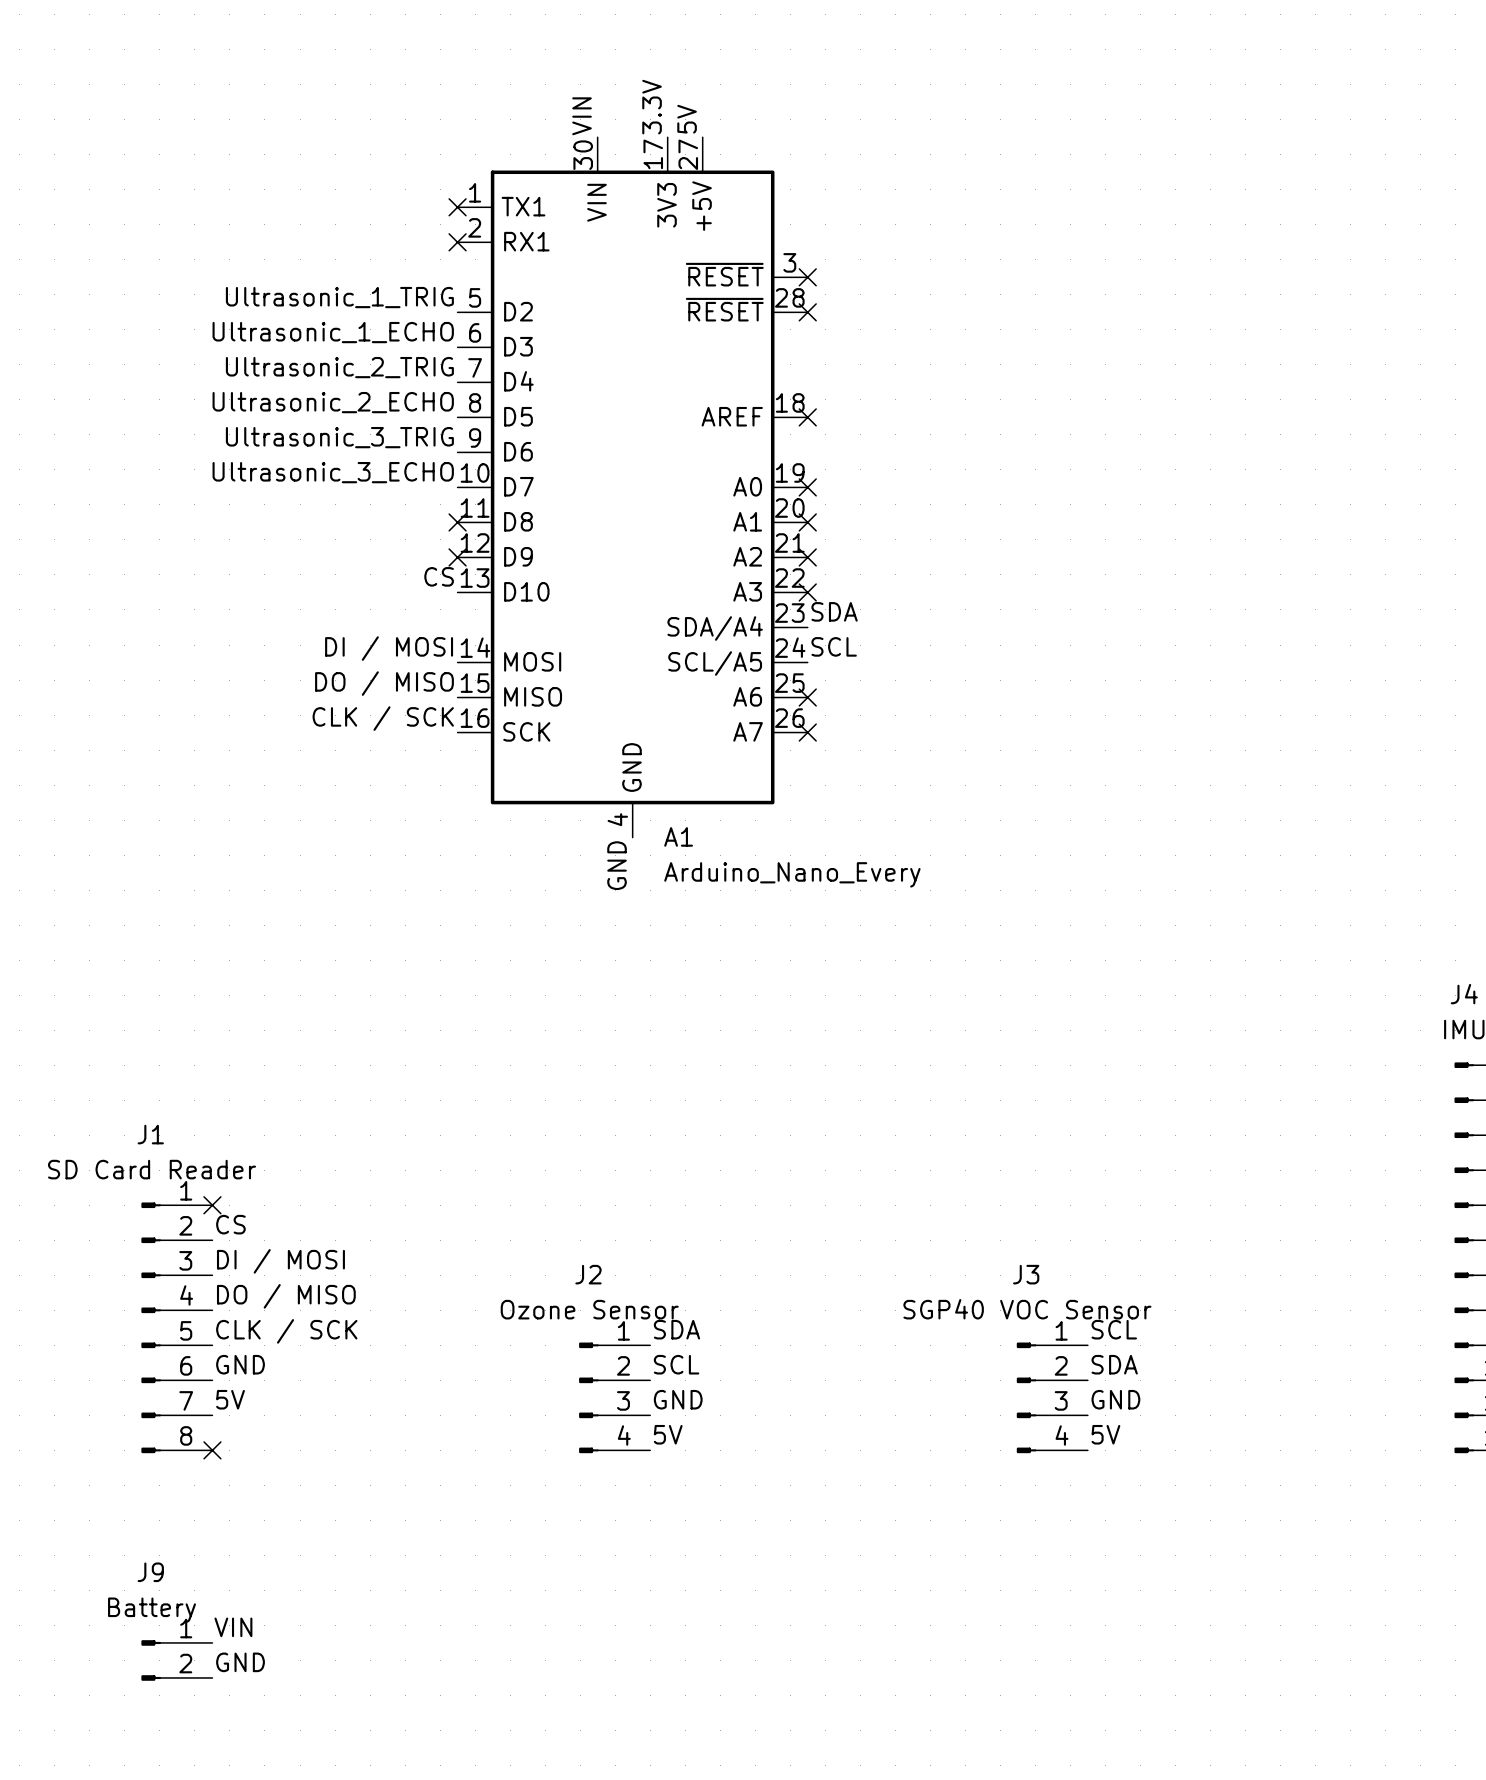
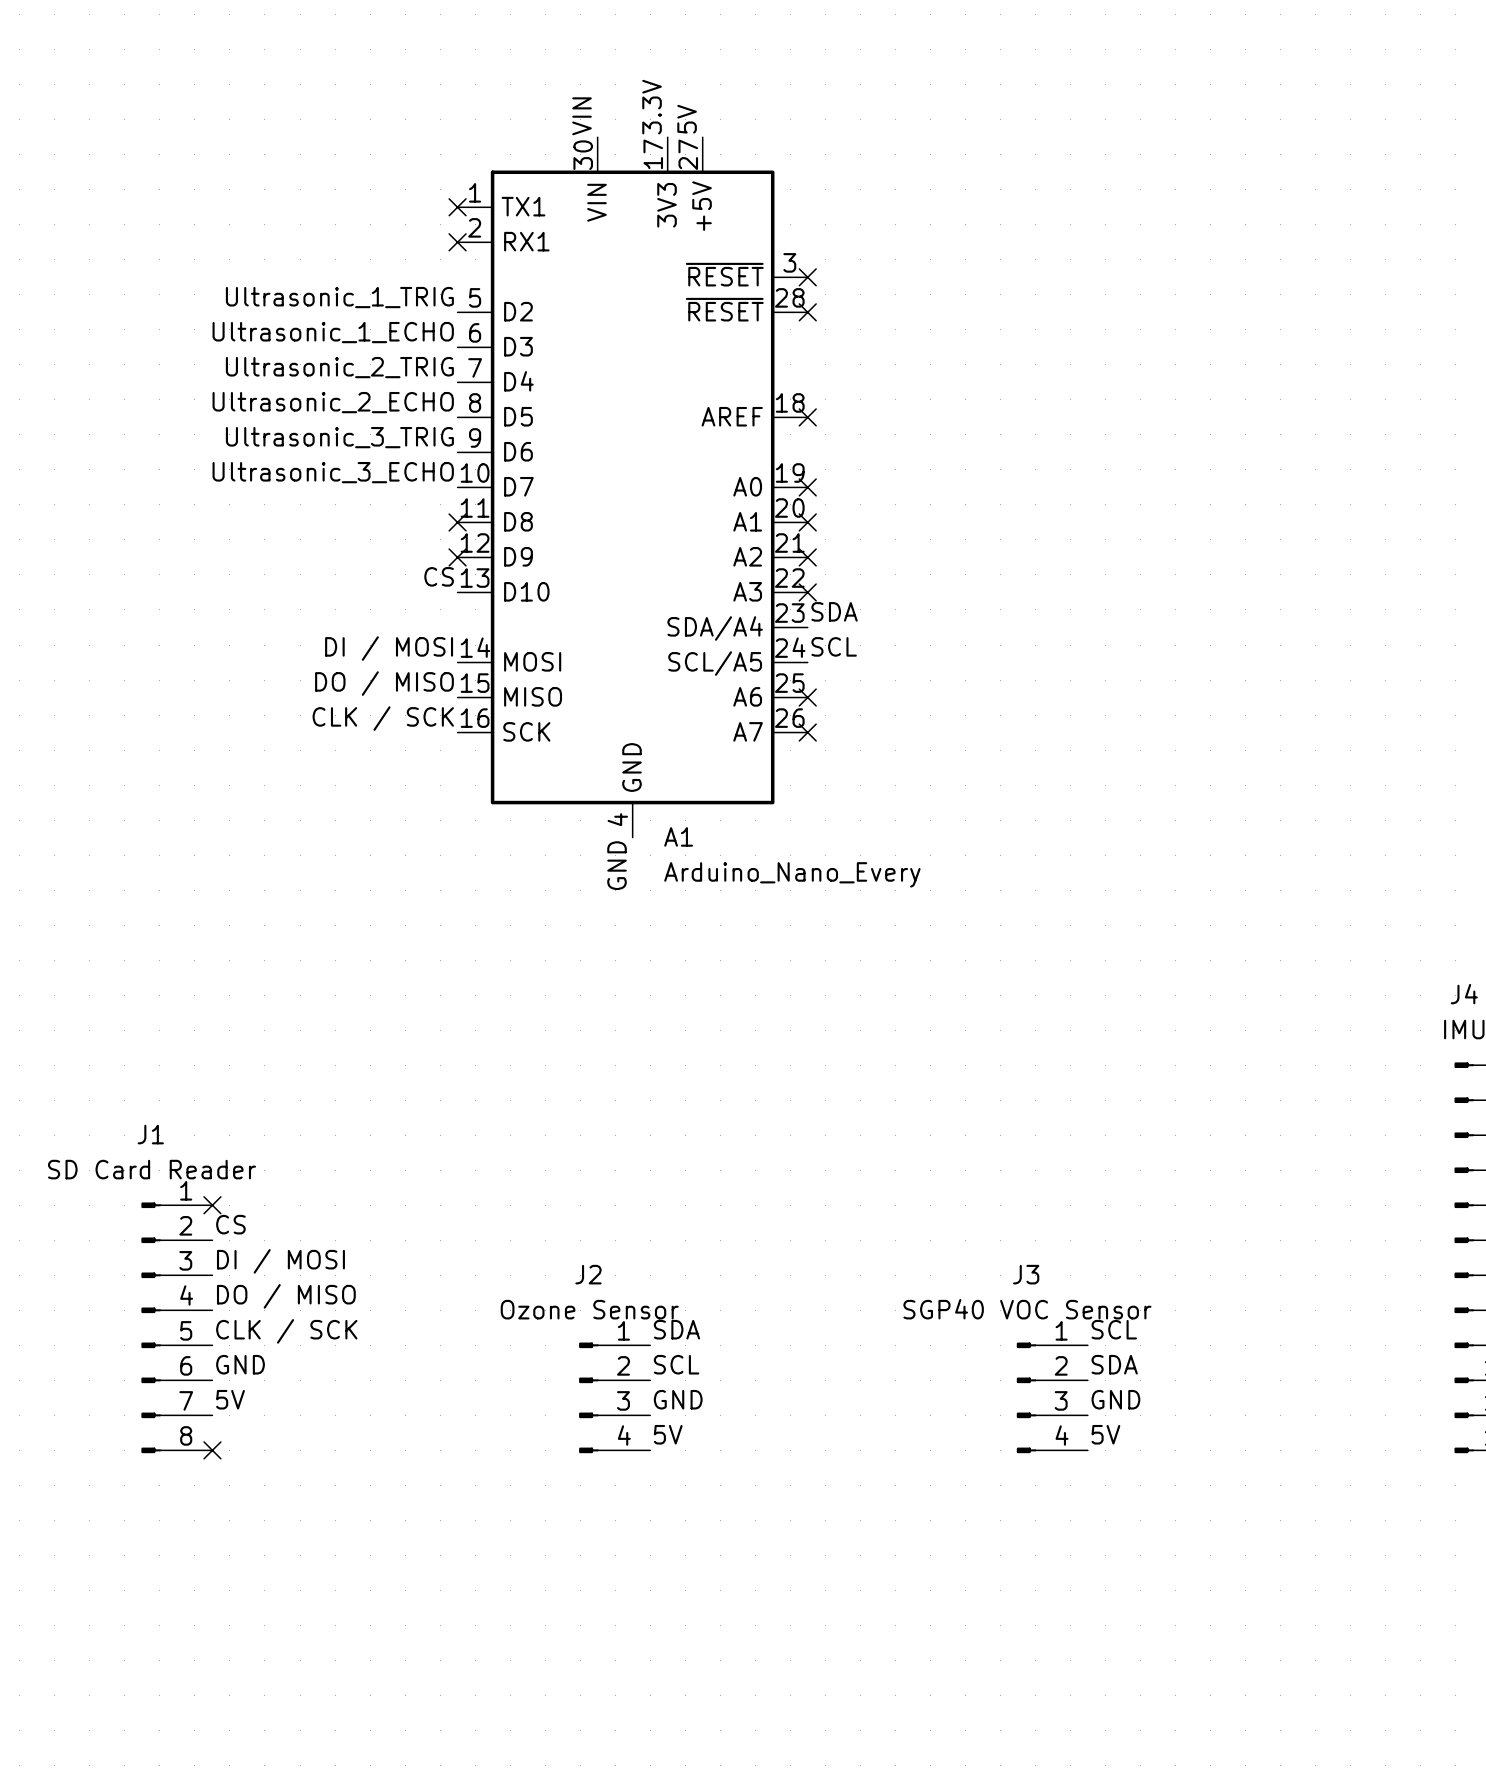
label: VIN (233, 1627) -> none
J9: Battery (176, 1660) -> none
label: GND (240, 1662) -> none

